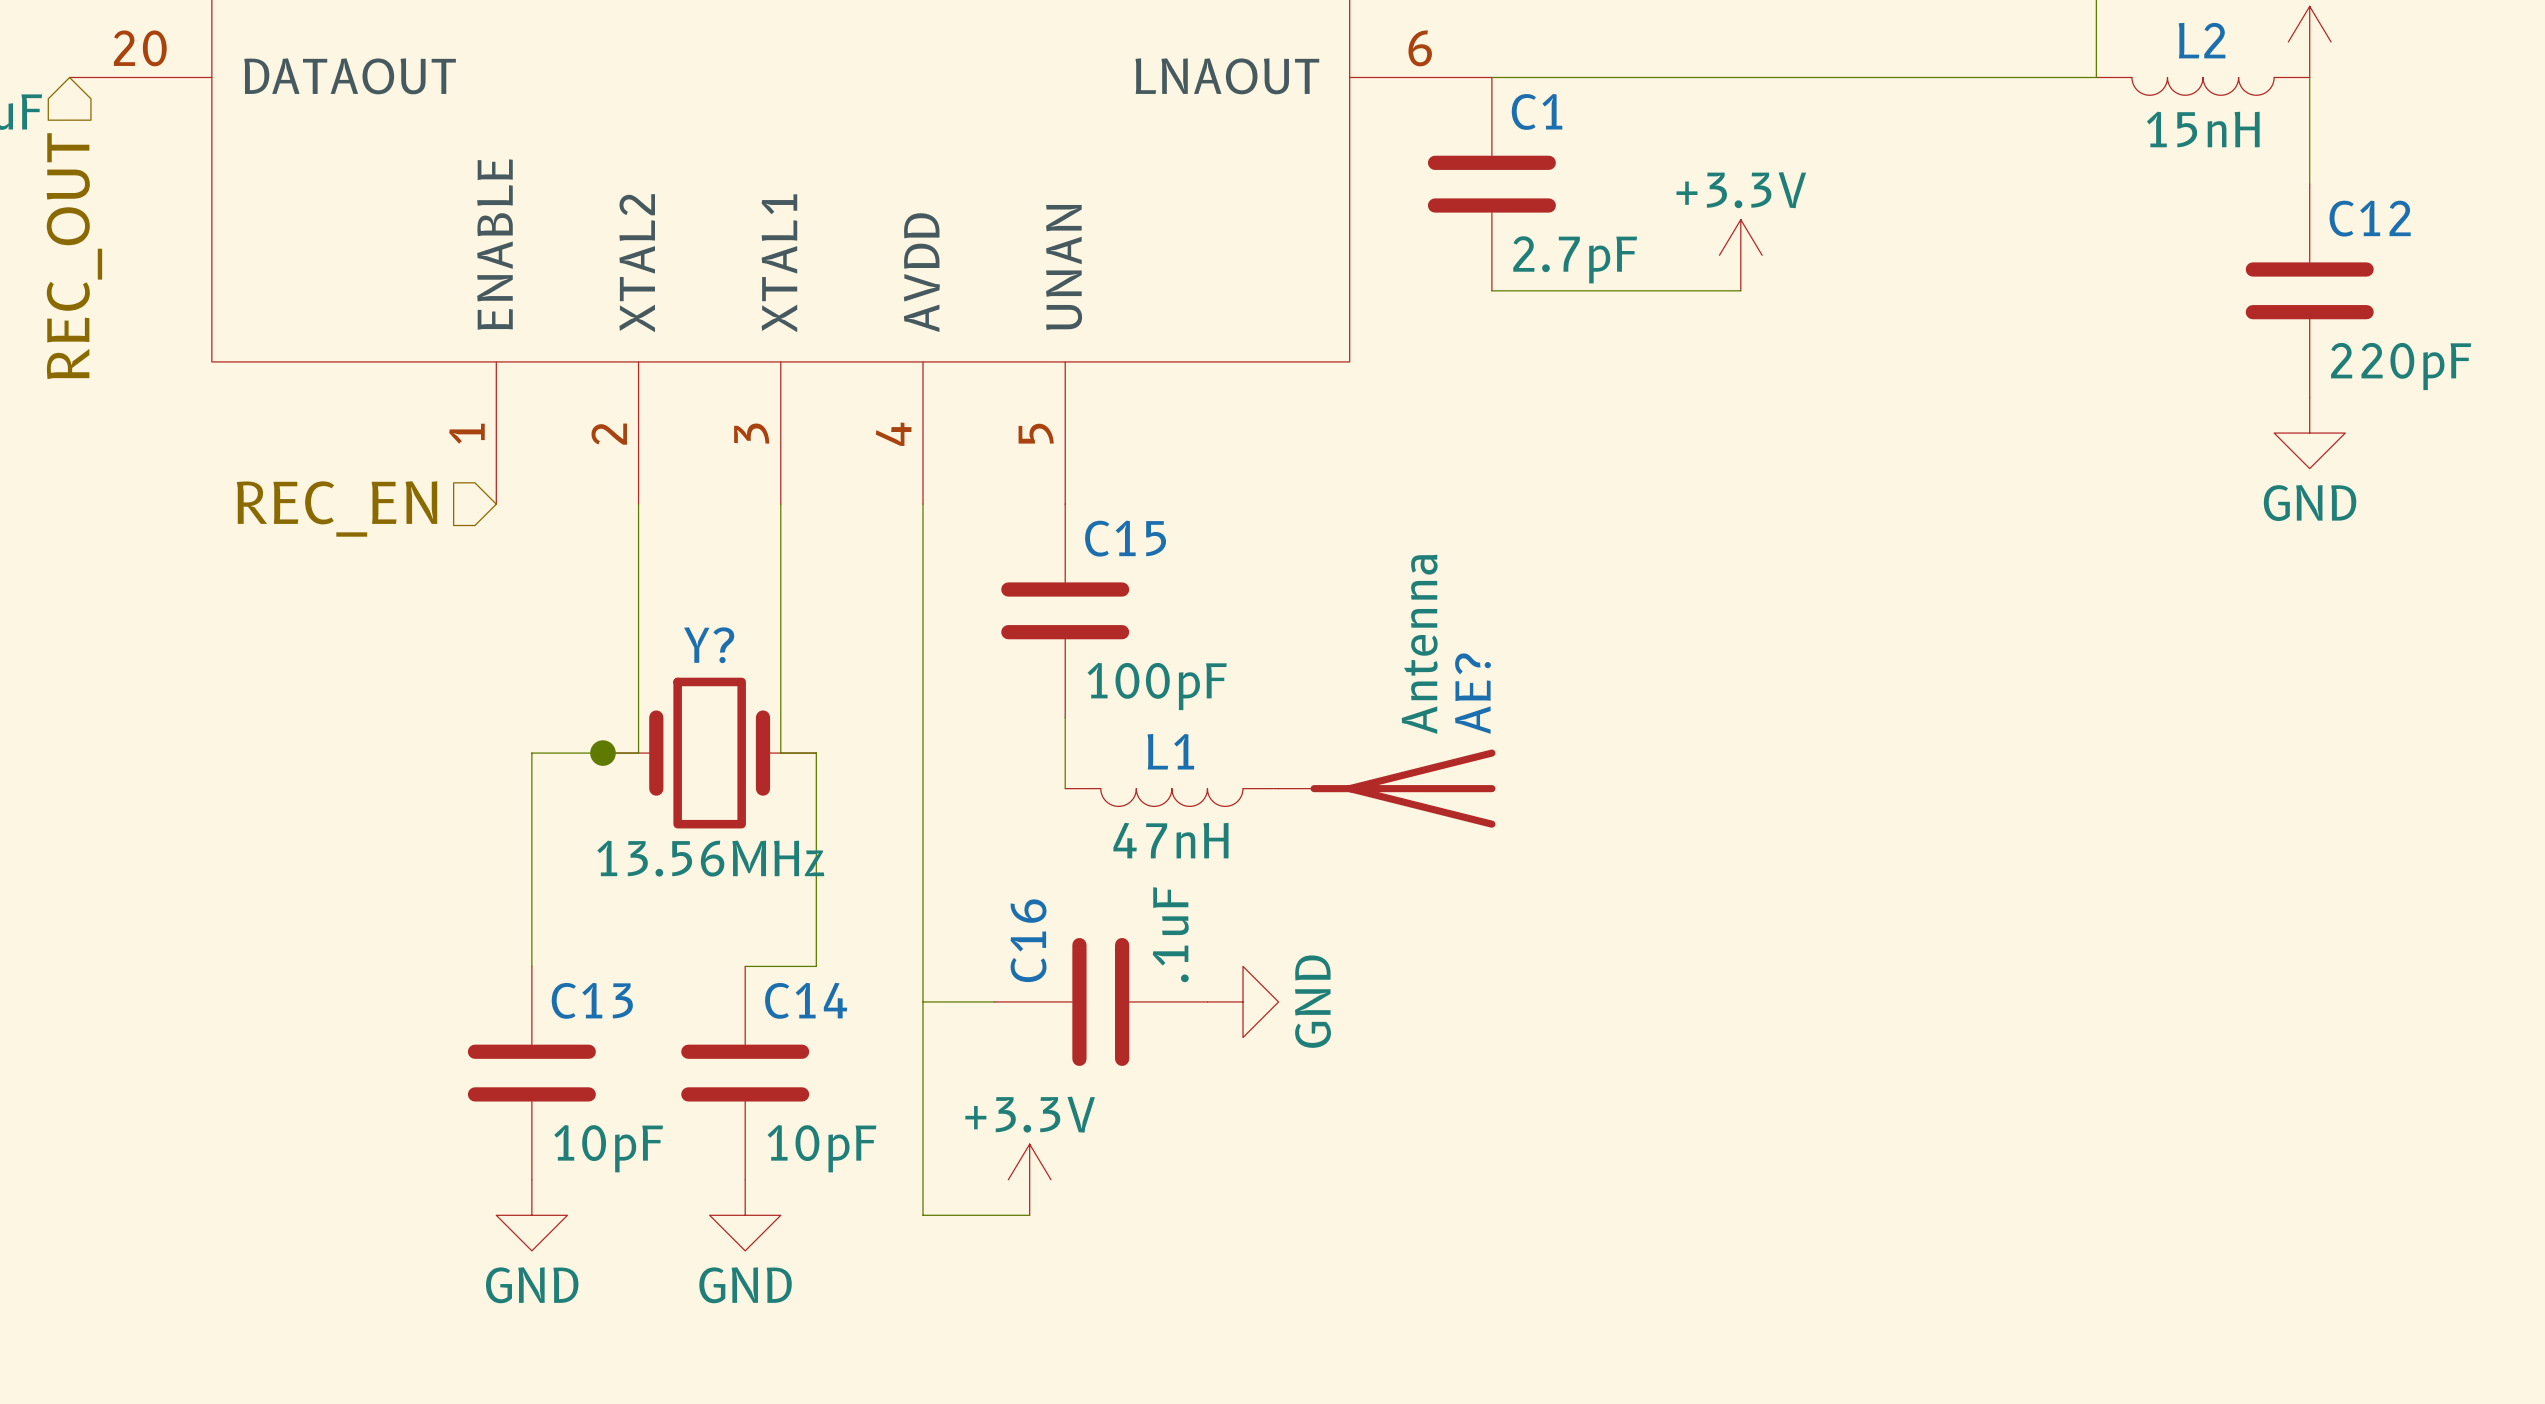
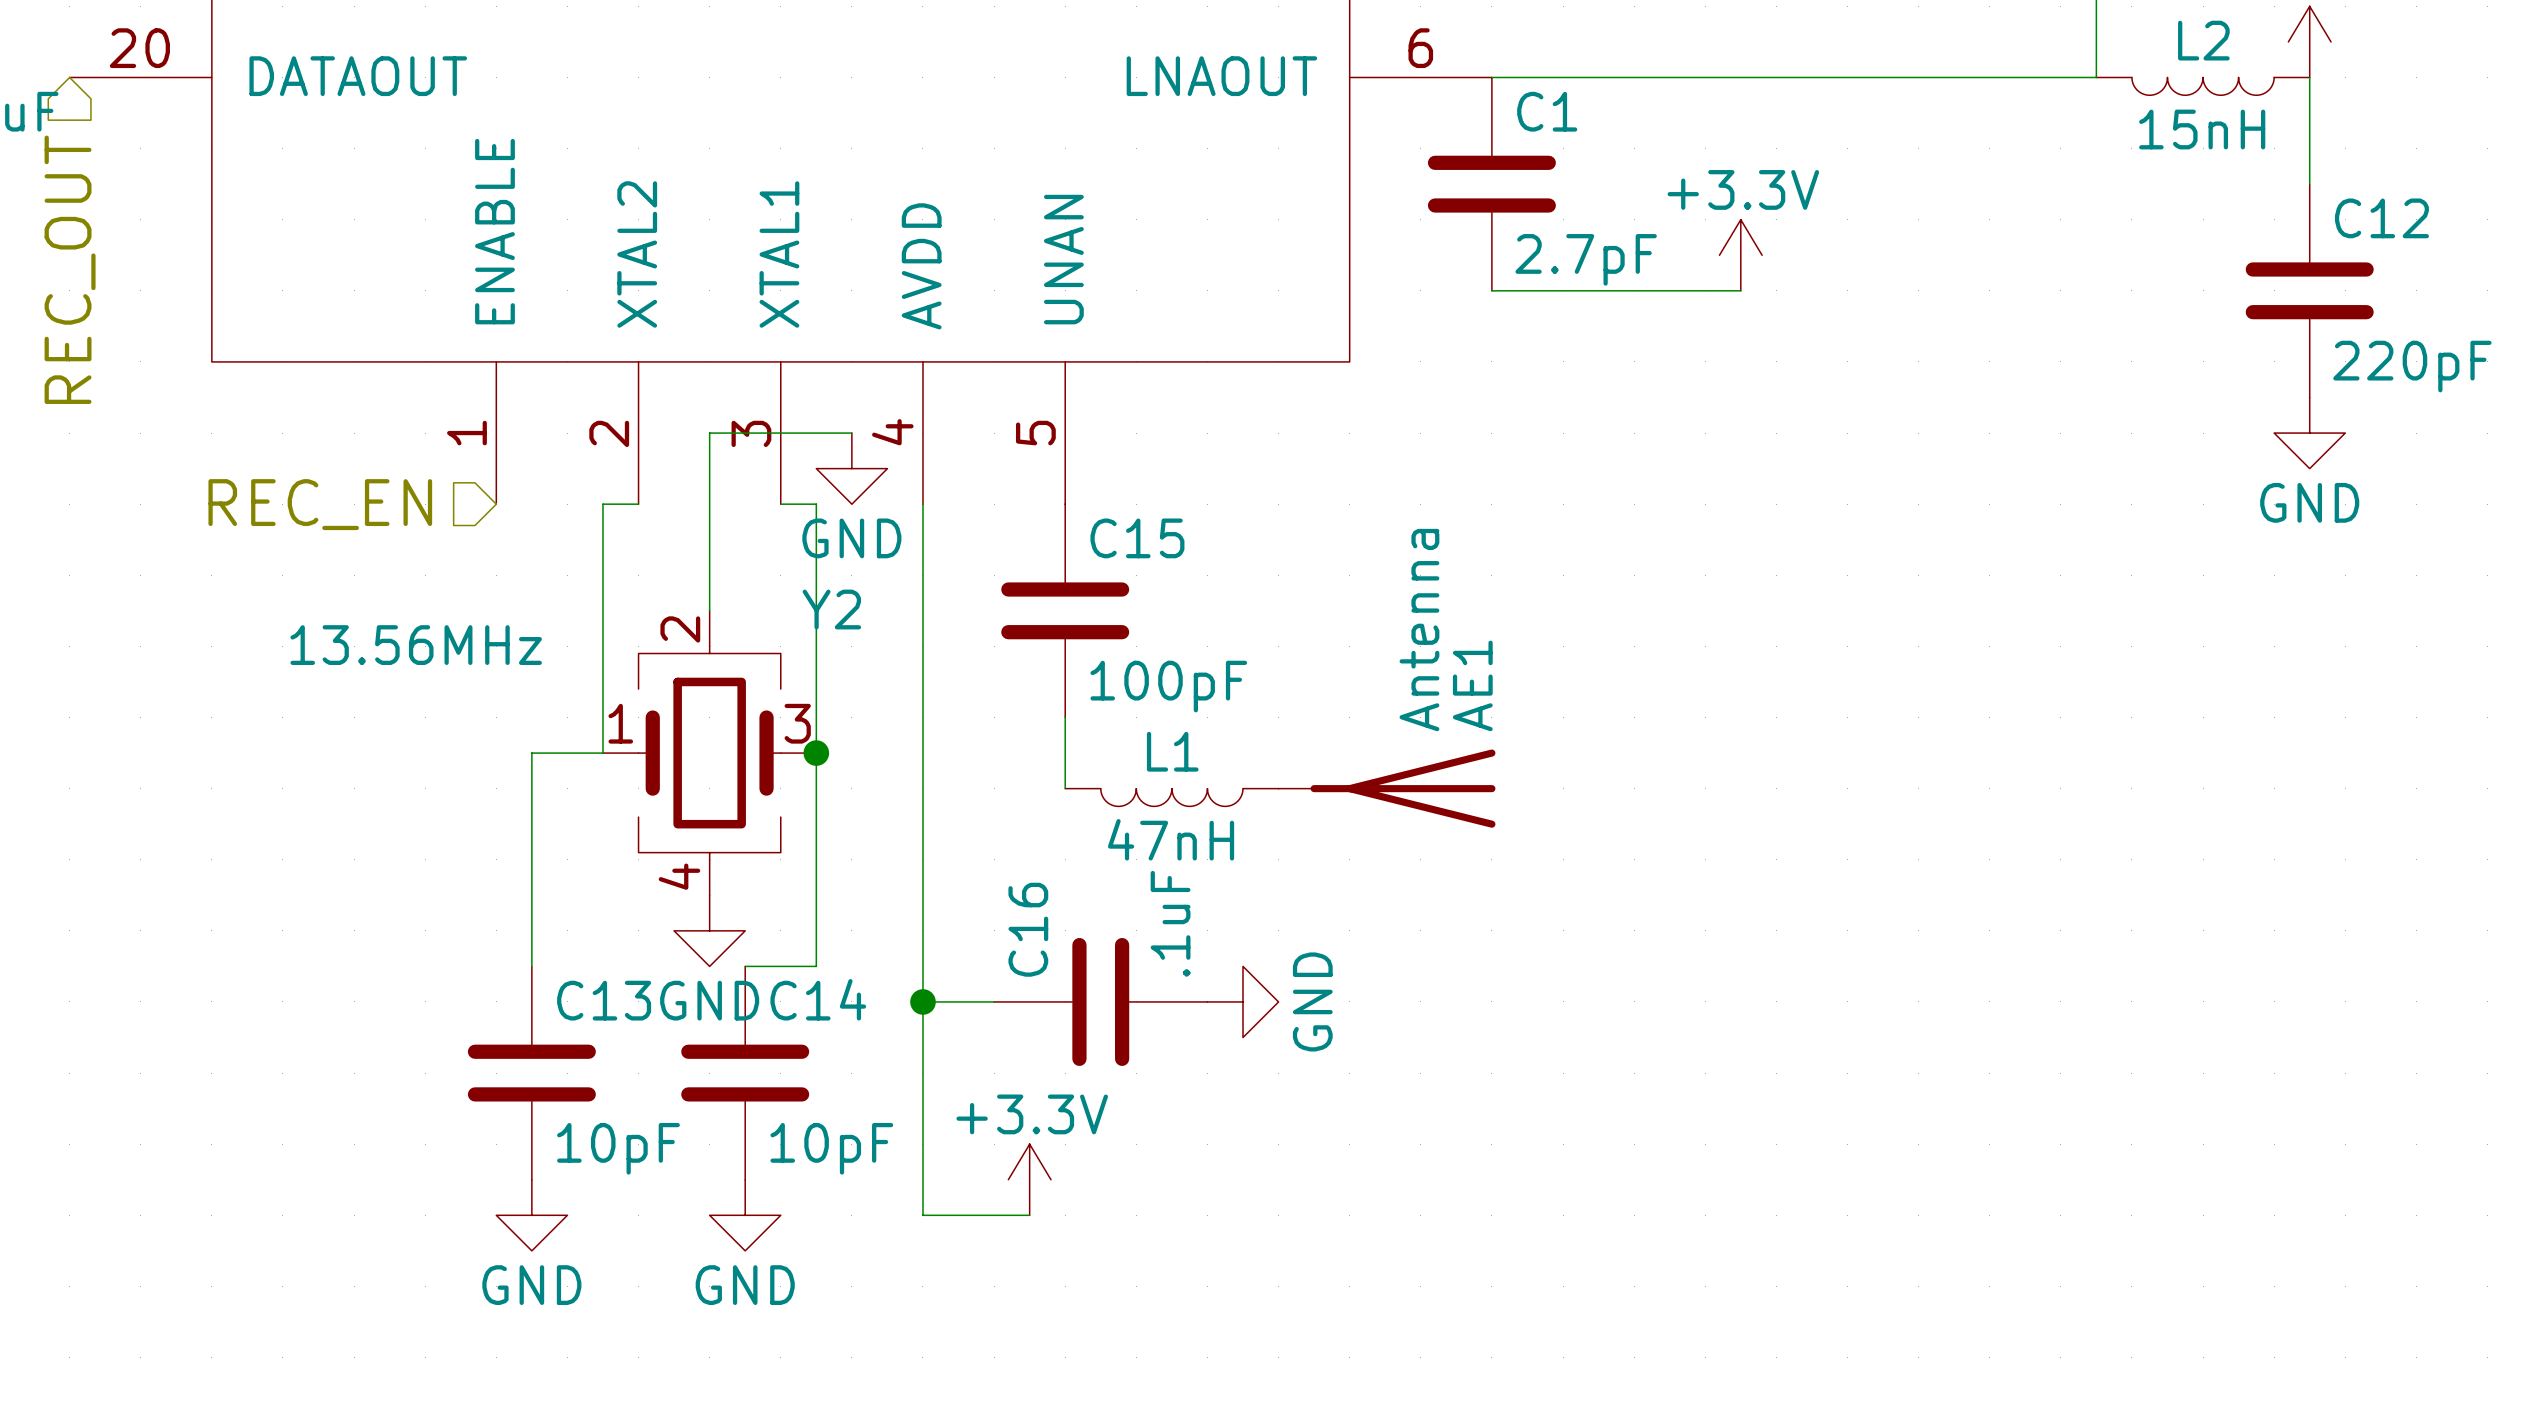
wire: none -> (851, 433) (709, 433) (709, 610)
power symbol: none -> GND (851, 468)
wire: (638, 504) (638, 753) (602, 753) -> (638, 504) (602, 504) (602, 753)
wire: (780, 504) (780, 753) (816, 753) -> (780, 504) (816, 504) (816, 753)
AE? name: AE? (1472, 693) -> AE1 (1472, 685)
junction: (602, 753) -> none
Y?: 13.56MHz (709, 753) -> none
Y2: none -> 13.56MHz (709, 753)
junction: none -> (816, 753)
power symbol: none -> GND (709, 930)
junction: none -> (922, 1001)

